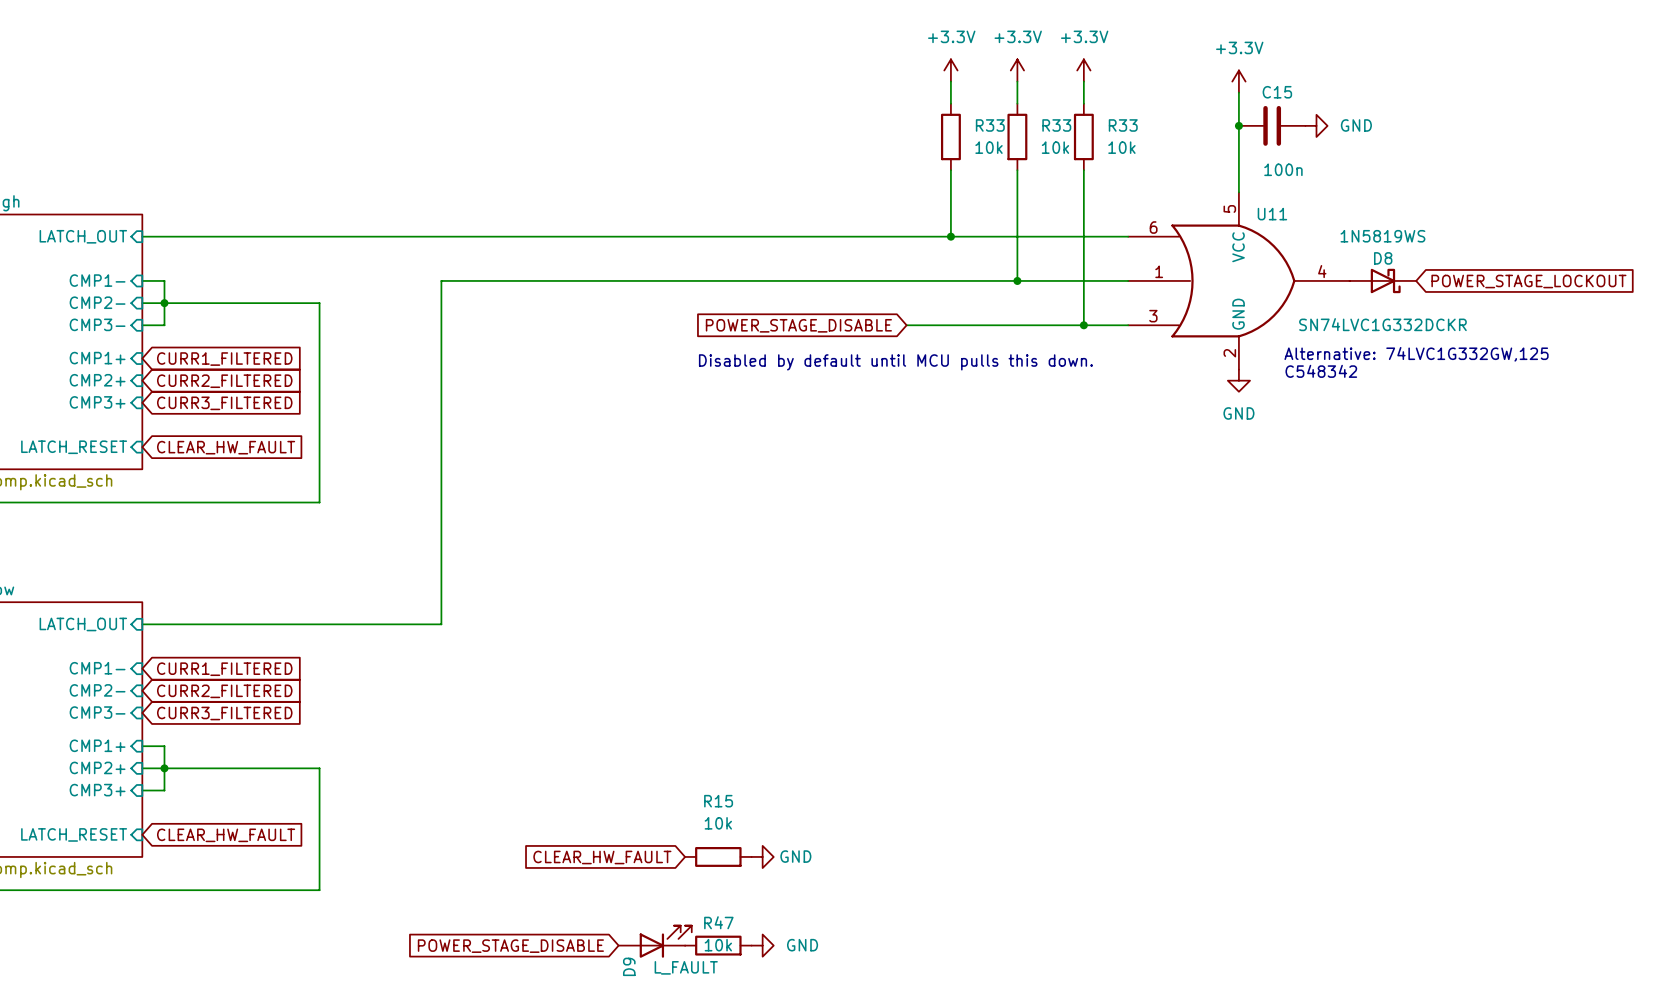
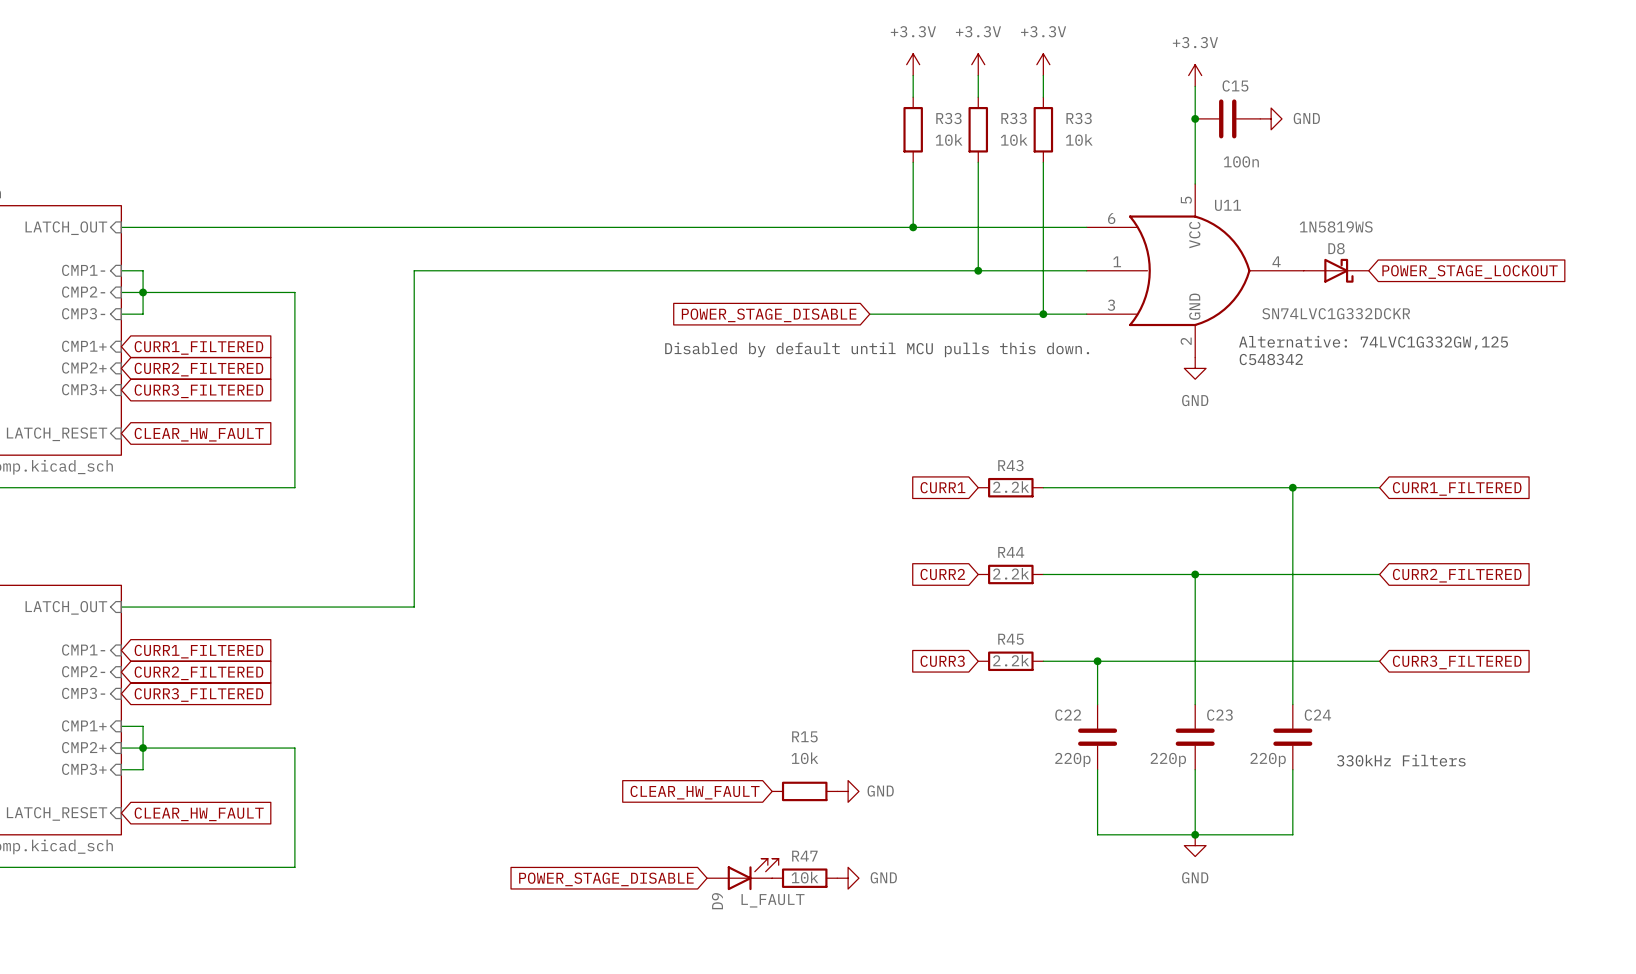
global label: none -> CURR1 (942, 487)
R43: none -> 2.2k (1010, 487)
wire: none -> (1043, 487) (1379, 487)
wire: none -> (1292, 487) (1292, 704)
junction: none -> (1292, 487)
global label: none -> CURR1_FILTERED (1457, 488)
global label: none -> CURR2 (942, 574)
R44: none -> 2.2k (1010, 574)
wire: none -> (1043, 574) (1379, 574)
wire: none -> (1195, 574) (1195, 704)
junction: none -> (1195, 574)
global label: none -> CURR2_FILTERED (1457, 575)
global label: none -> CURR3 (942, 661)
R45: none -> 2.2k (1010, 661)
wire: none -> (1043, 661) (1379, 661)
wire: none -> (1097, 661) (1097, 704)
junction: none -> (1097, 661)
global label: none -> CURR3_FILTERED (1457, 662)
C22: none -> 220p (1097, 737)
C23: none -> 220p (1195, 737)
C24: none -> 220p (1292, 737)
text: none -> 330kHz Filters (1401, 760)
wire: none -> (1097, 769) (1097, 834) (1292, 834) (1292, 769)
wire: none -> (1195, 769) (1195, 834)
power symbol: none -> GND (848, 791)
R15 position: (718, 856) -> (804, 791)
power symbol: GND (762, 856) -> none
junction: none -> (1195, 834)
global label position: CLEAR_HW_FAULT (602, 857) -> CLEAR_HW_FAULT (695, 792)
power symbol: none -> GND (1195, 845)
power symbol: none -> GND (848, 878)
D9 position: (655, 941) -> (742, 874)
R47 position: (718, 945) -> (804, 878)
power symbol: GND (762, 945) -> none
global label position: POWER_STAGE_DISABLE (510, 946) -> POWER_STAGE_DISABLE (606, 879)

